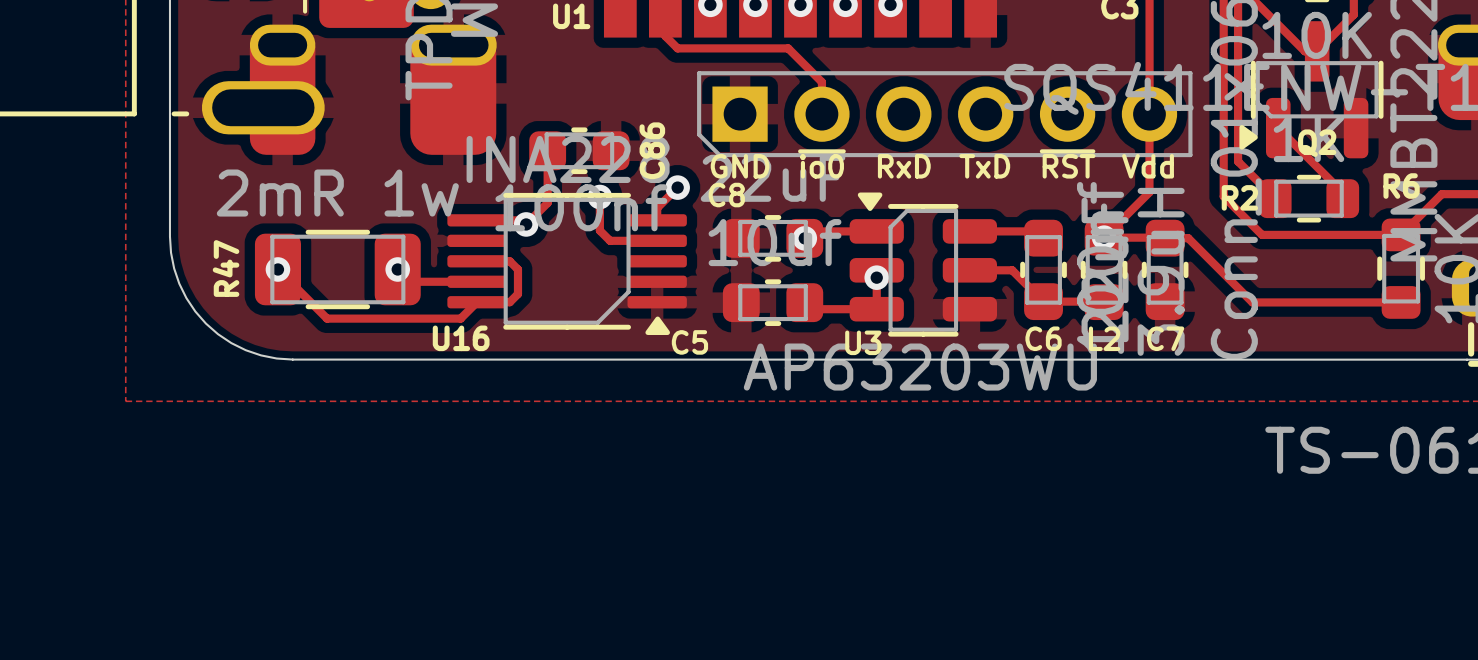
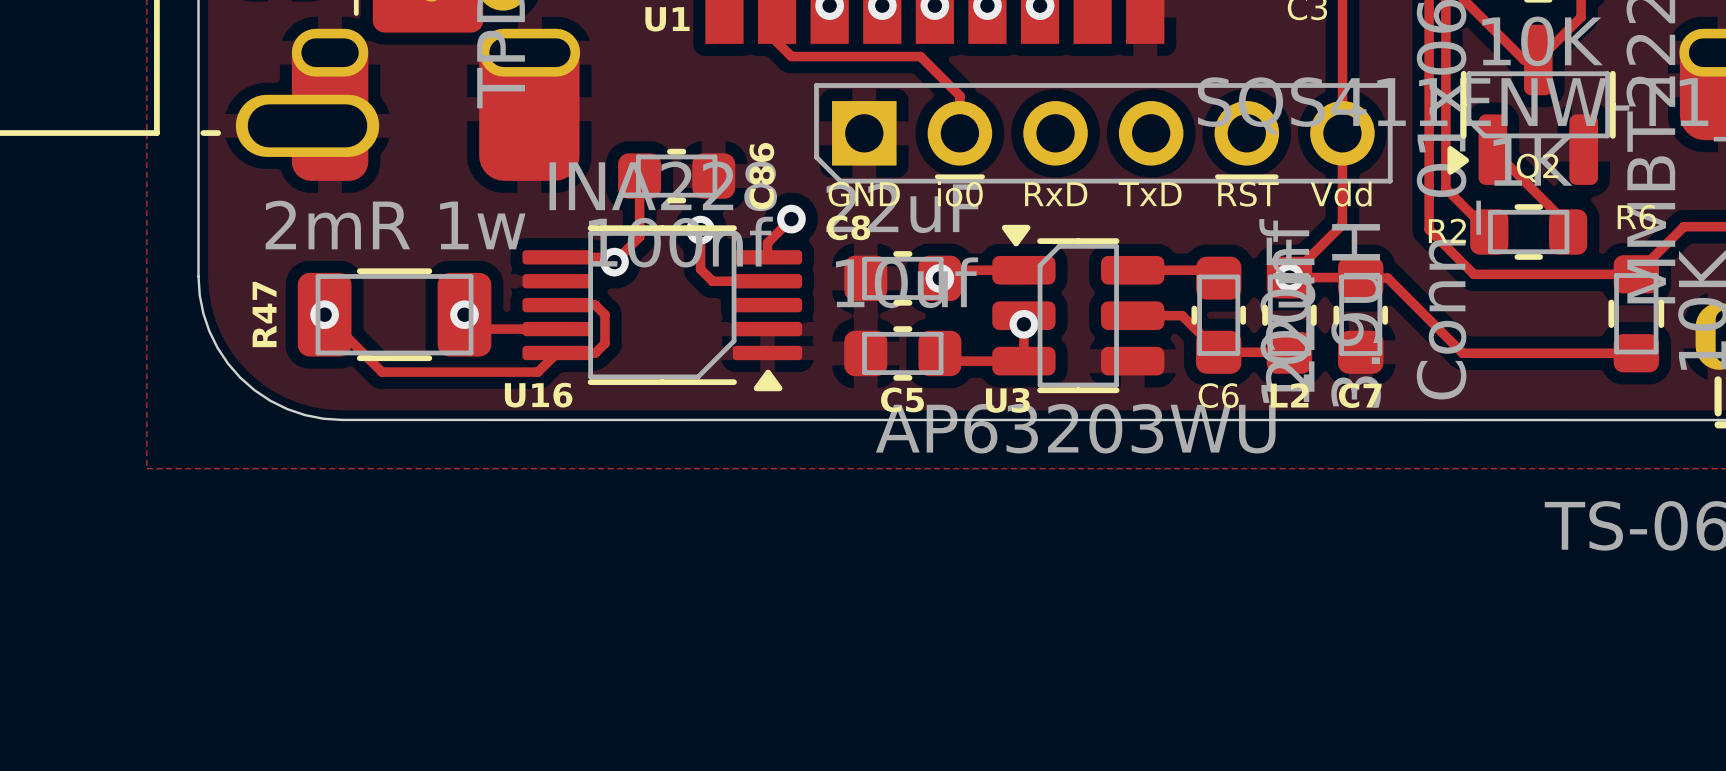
C5 name position: C5 (689, 342) -> C5 (902, 399)

